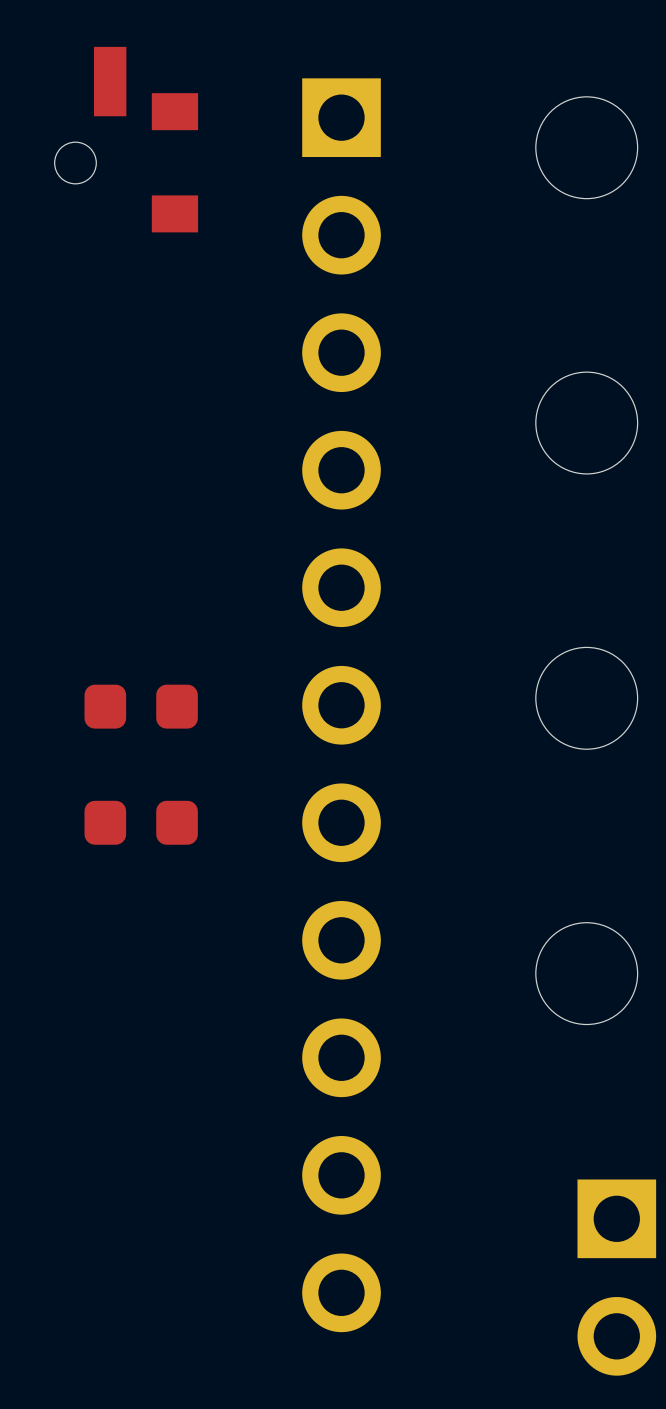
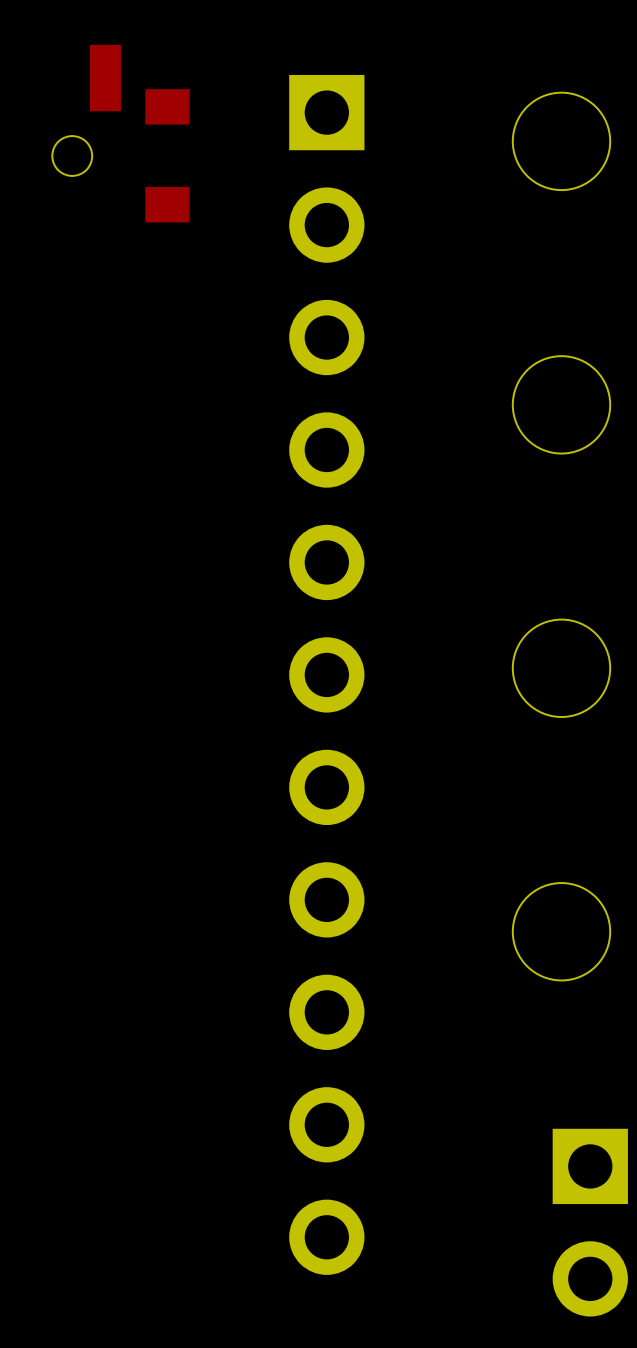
part: (141, 706) -> none
part: (141, 822) -> none

